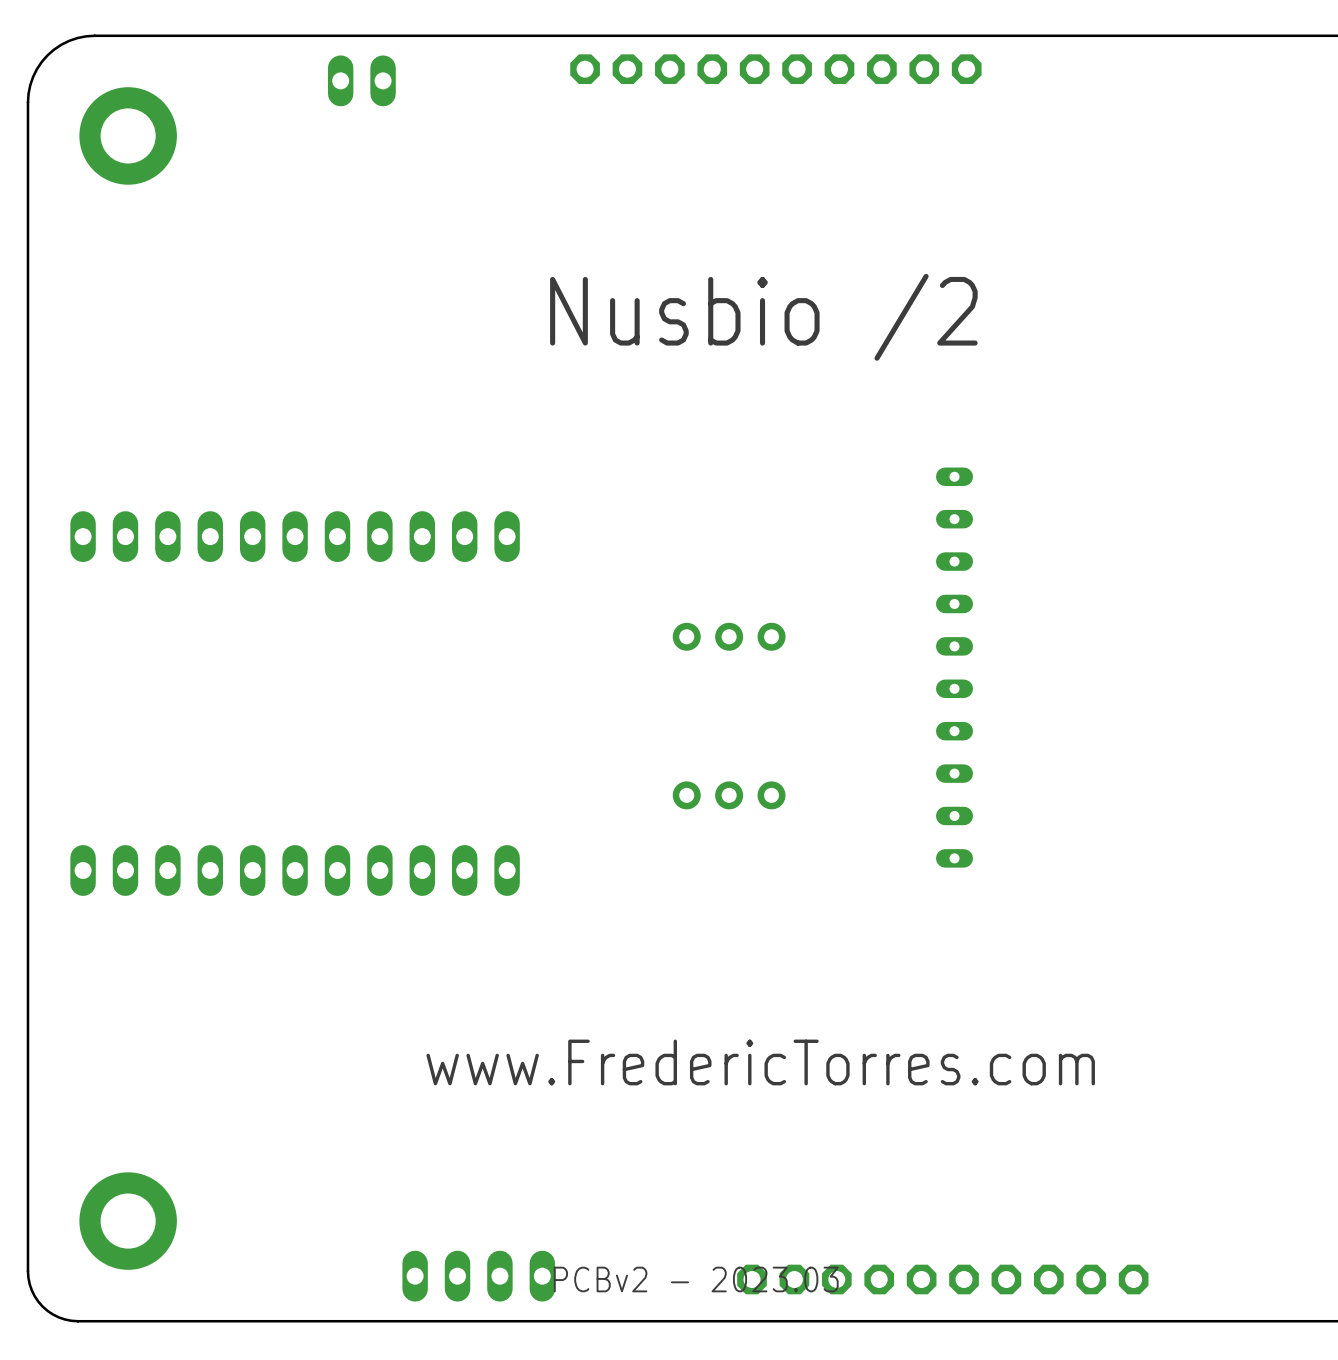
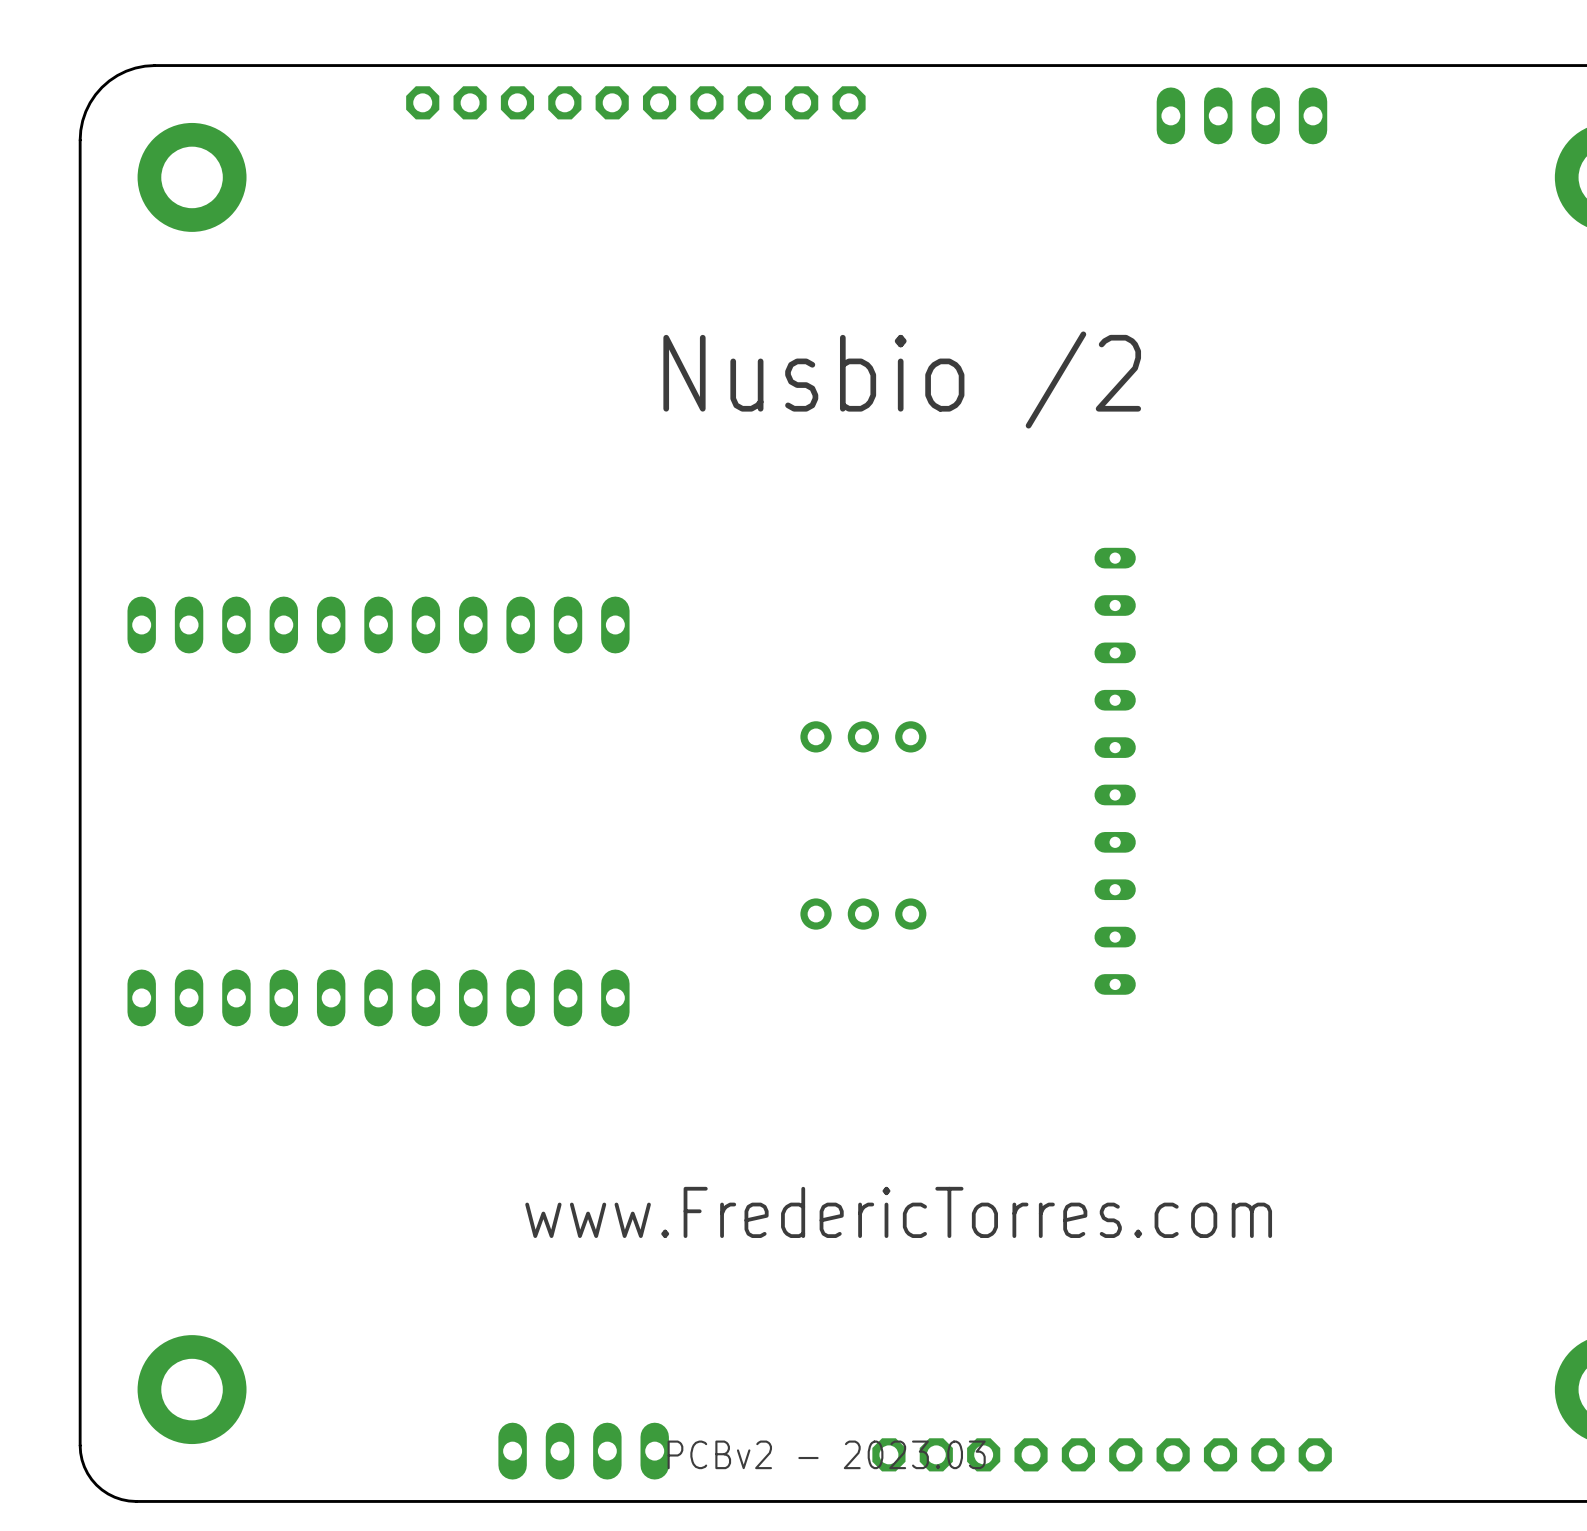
part position: (775, 69) -> (635, 102)
part: (361, 80) -> none
part: none -> (1241, 115)

